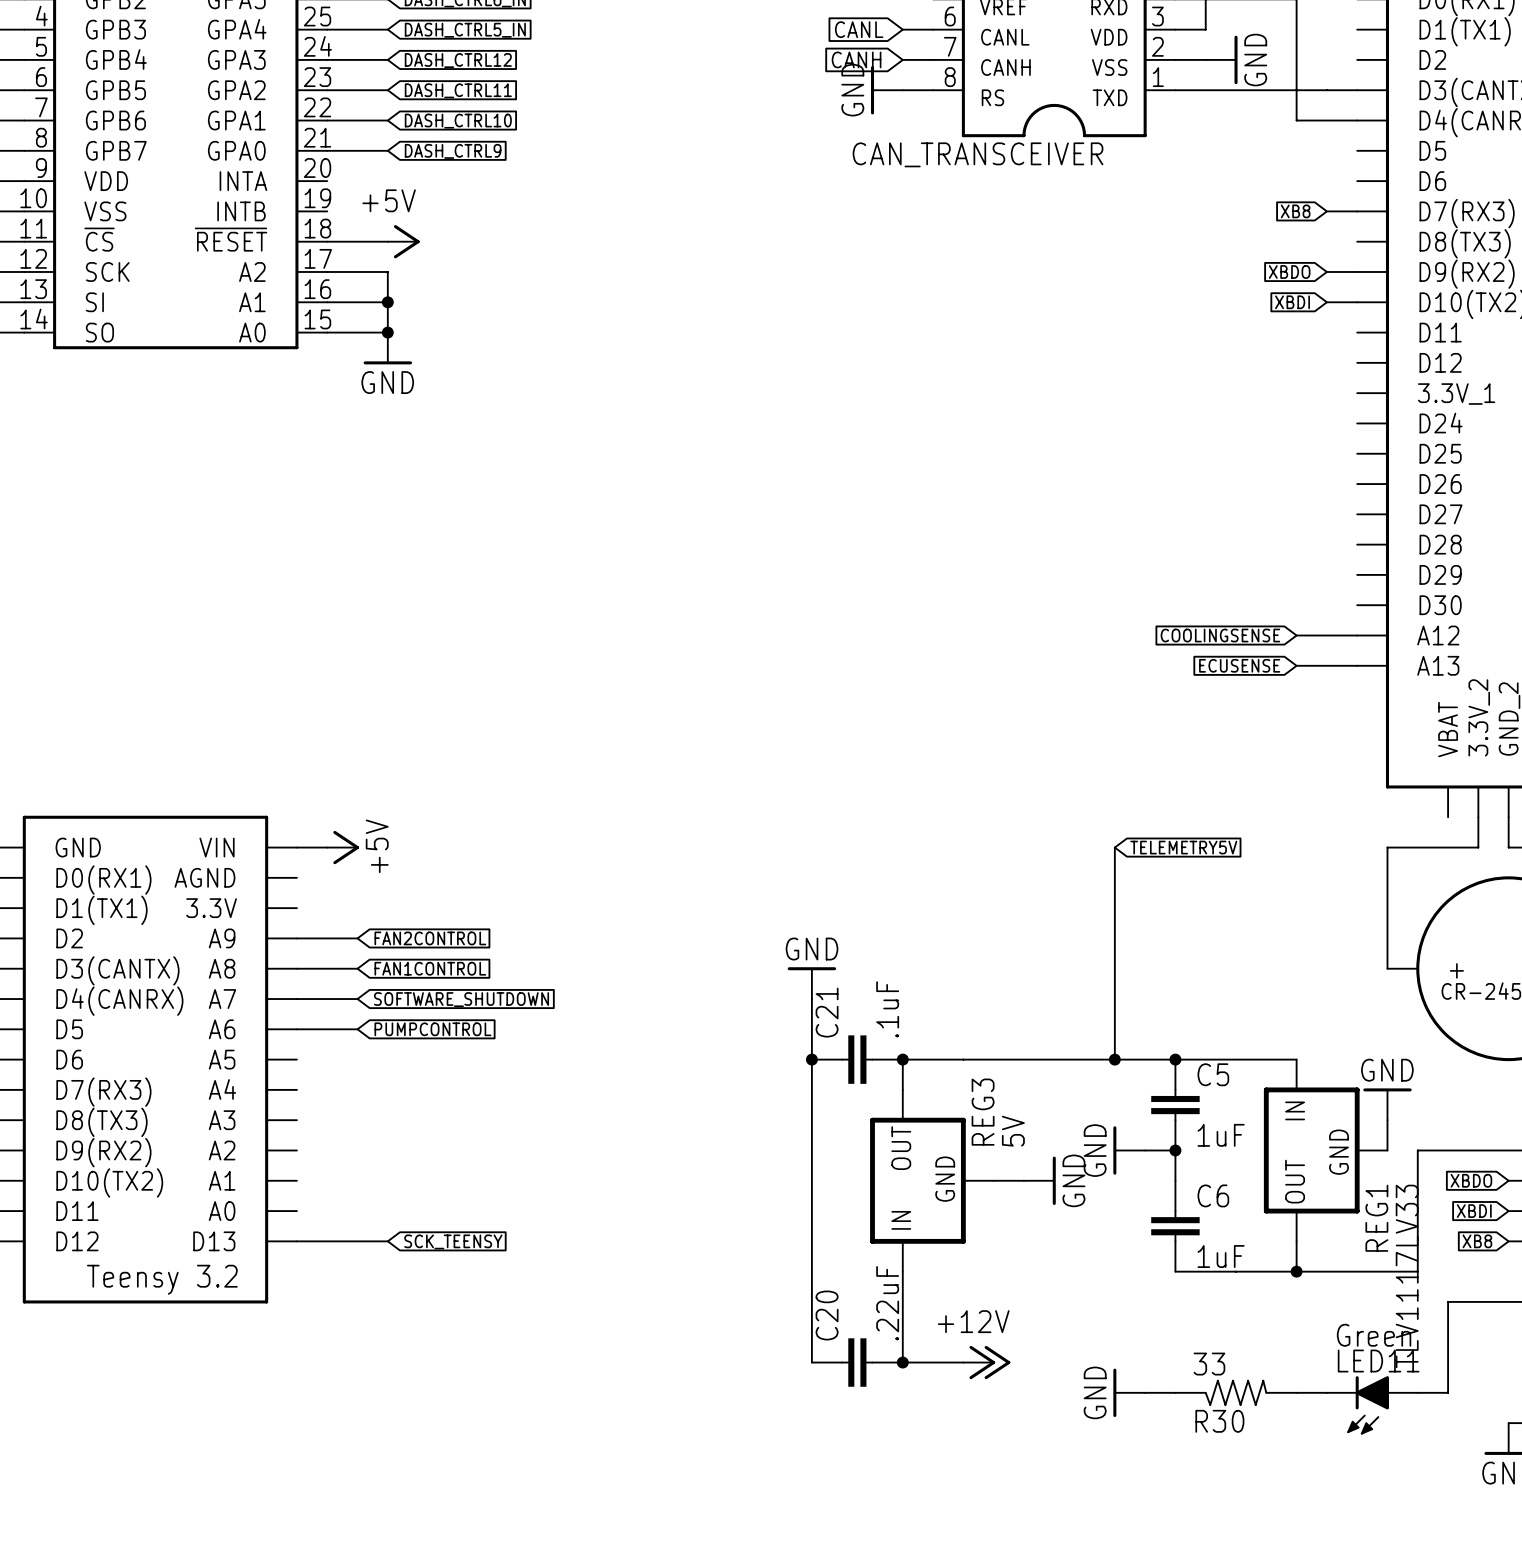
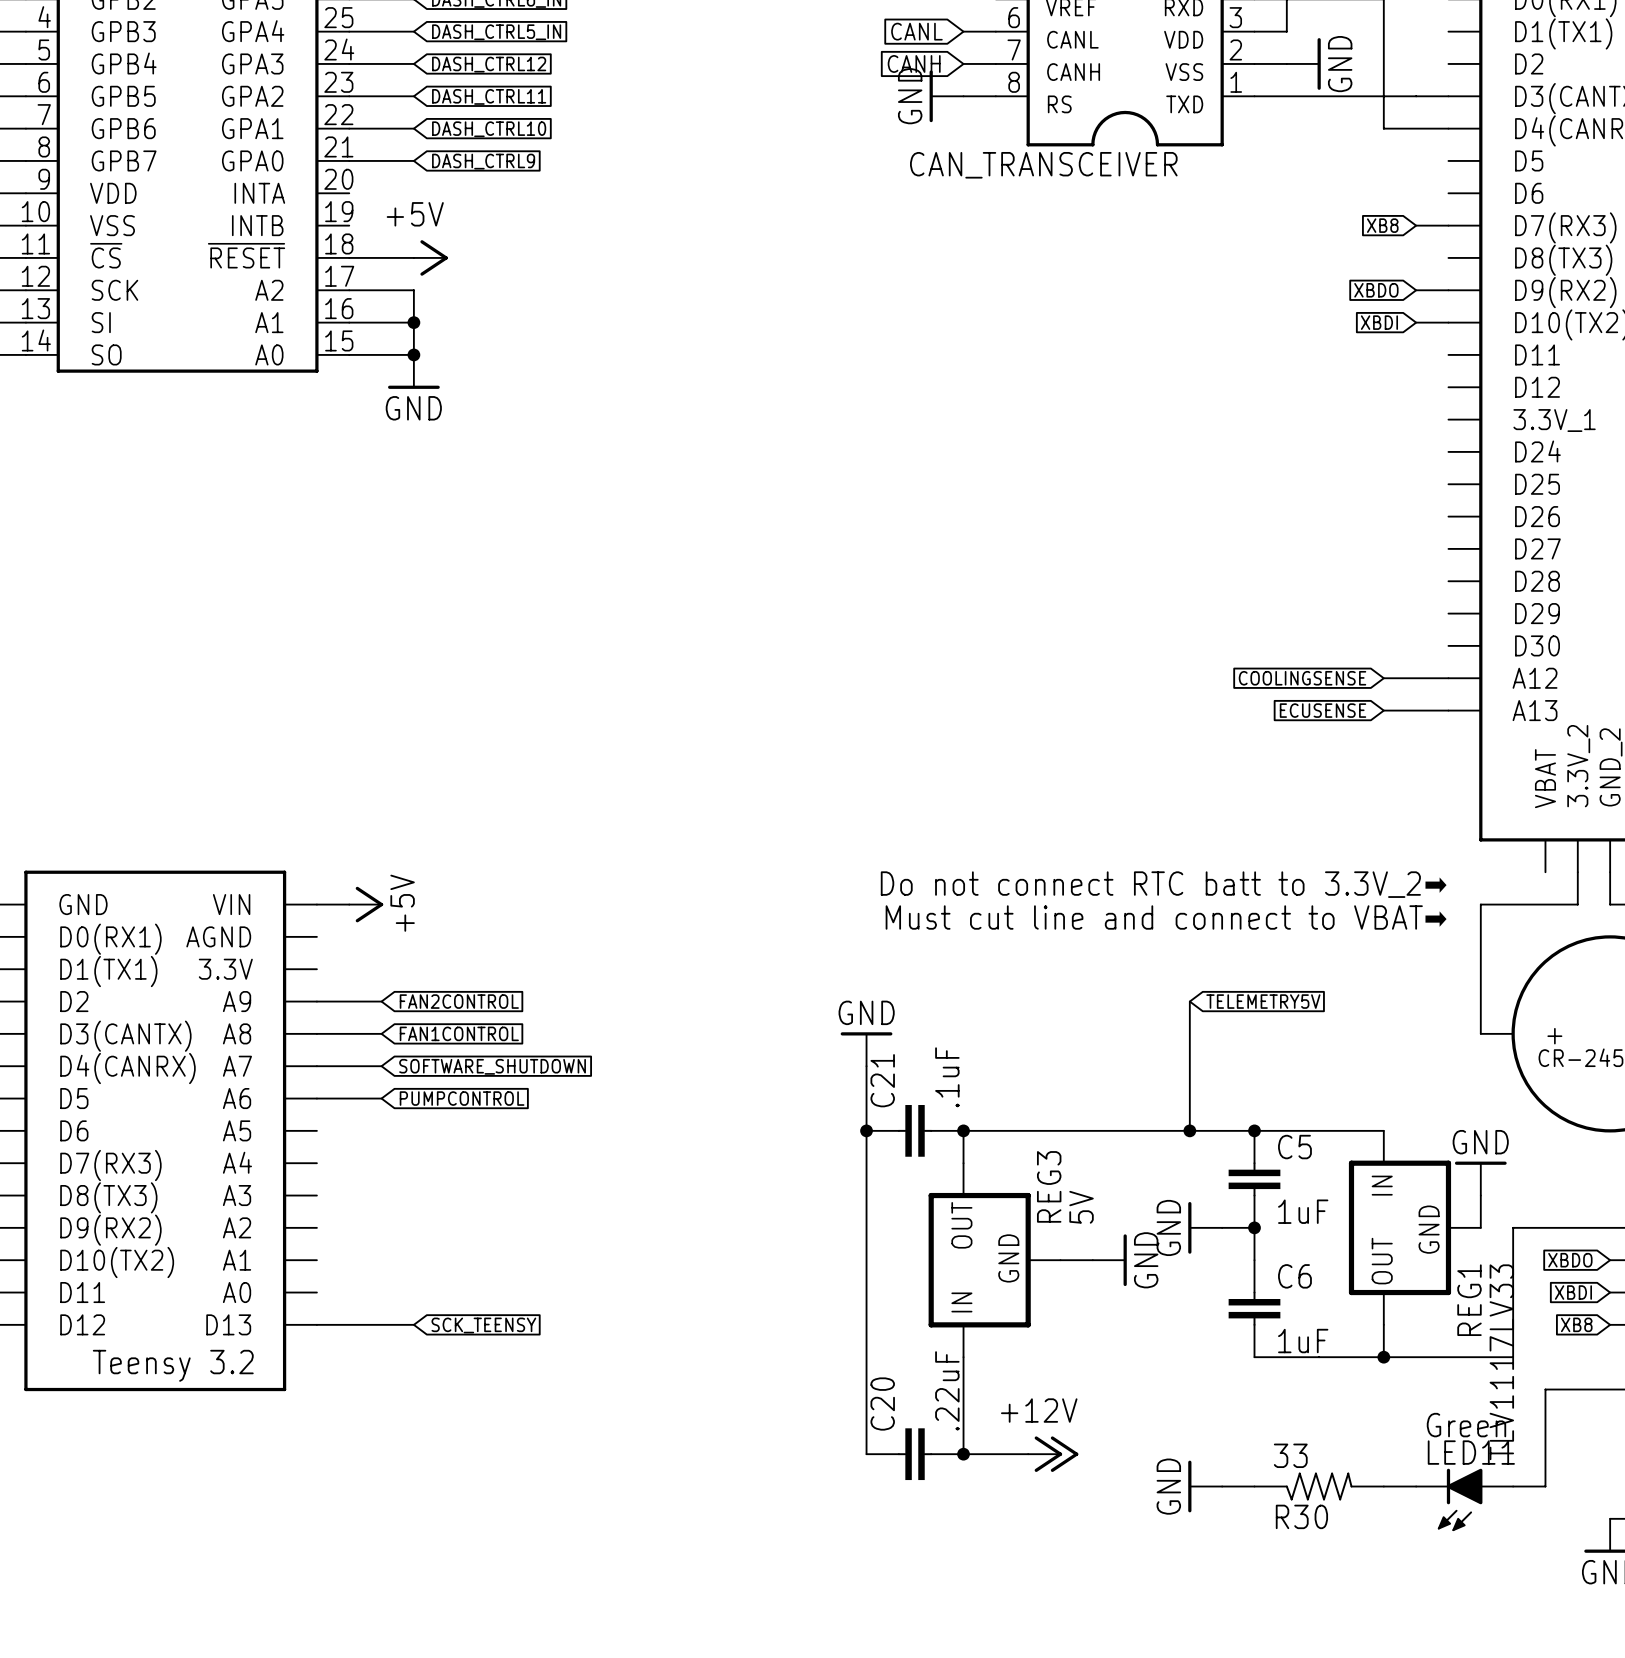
text: none -> Do not connect RTC batt to 3.3V_2➡ (1164, 884)
wire: (1114, 847) (1114, 938) -> none
global label position: TELEMETRY5V (1183, 847) -> TELEMETRY5V (1263, 1001)
text: none -> Must cut line and connect to VBAT➡ (1166, 917)

